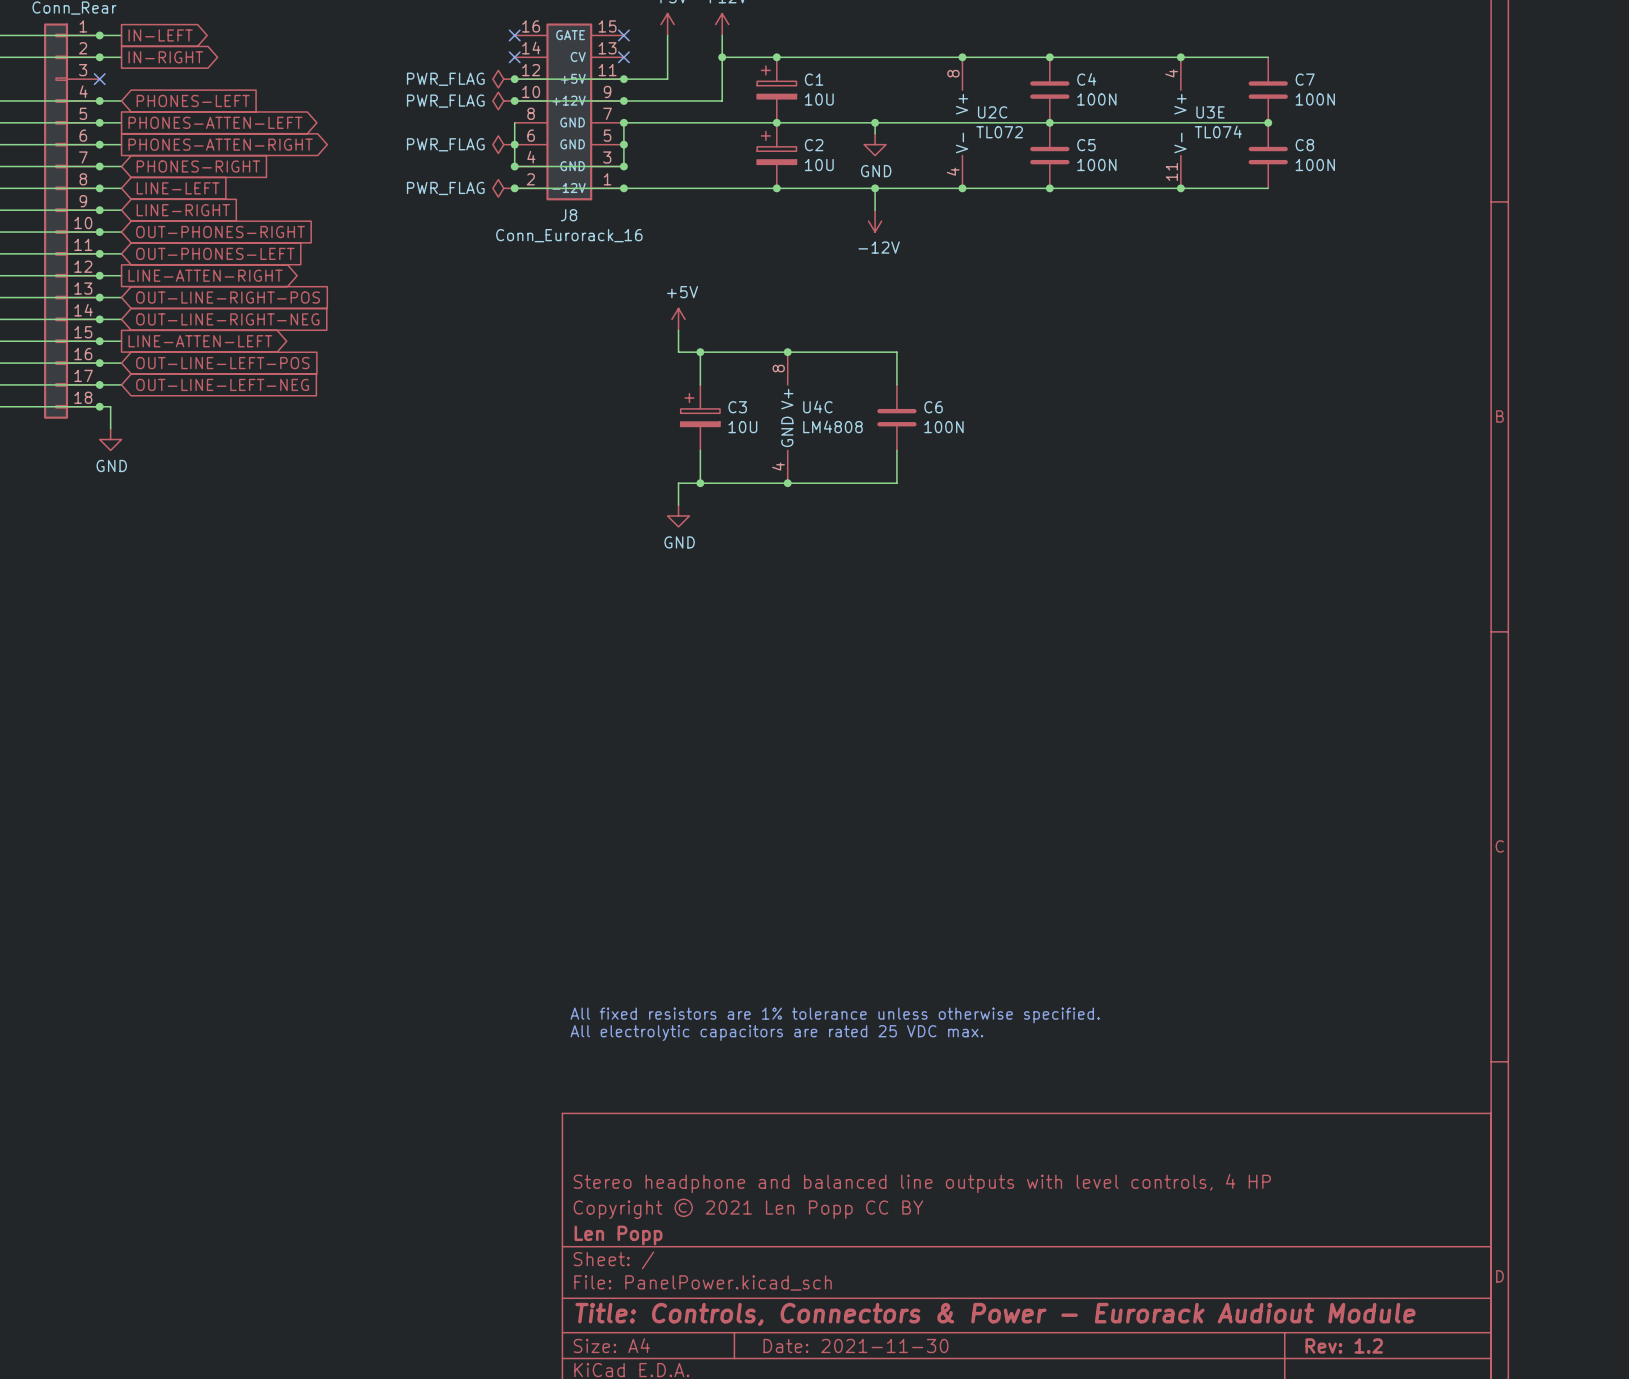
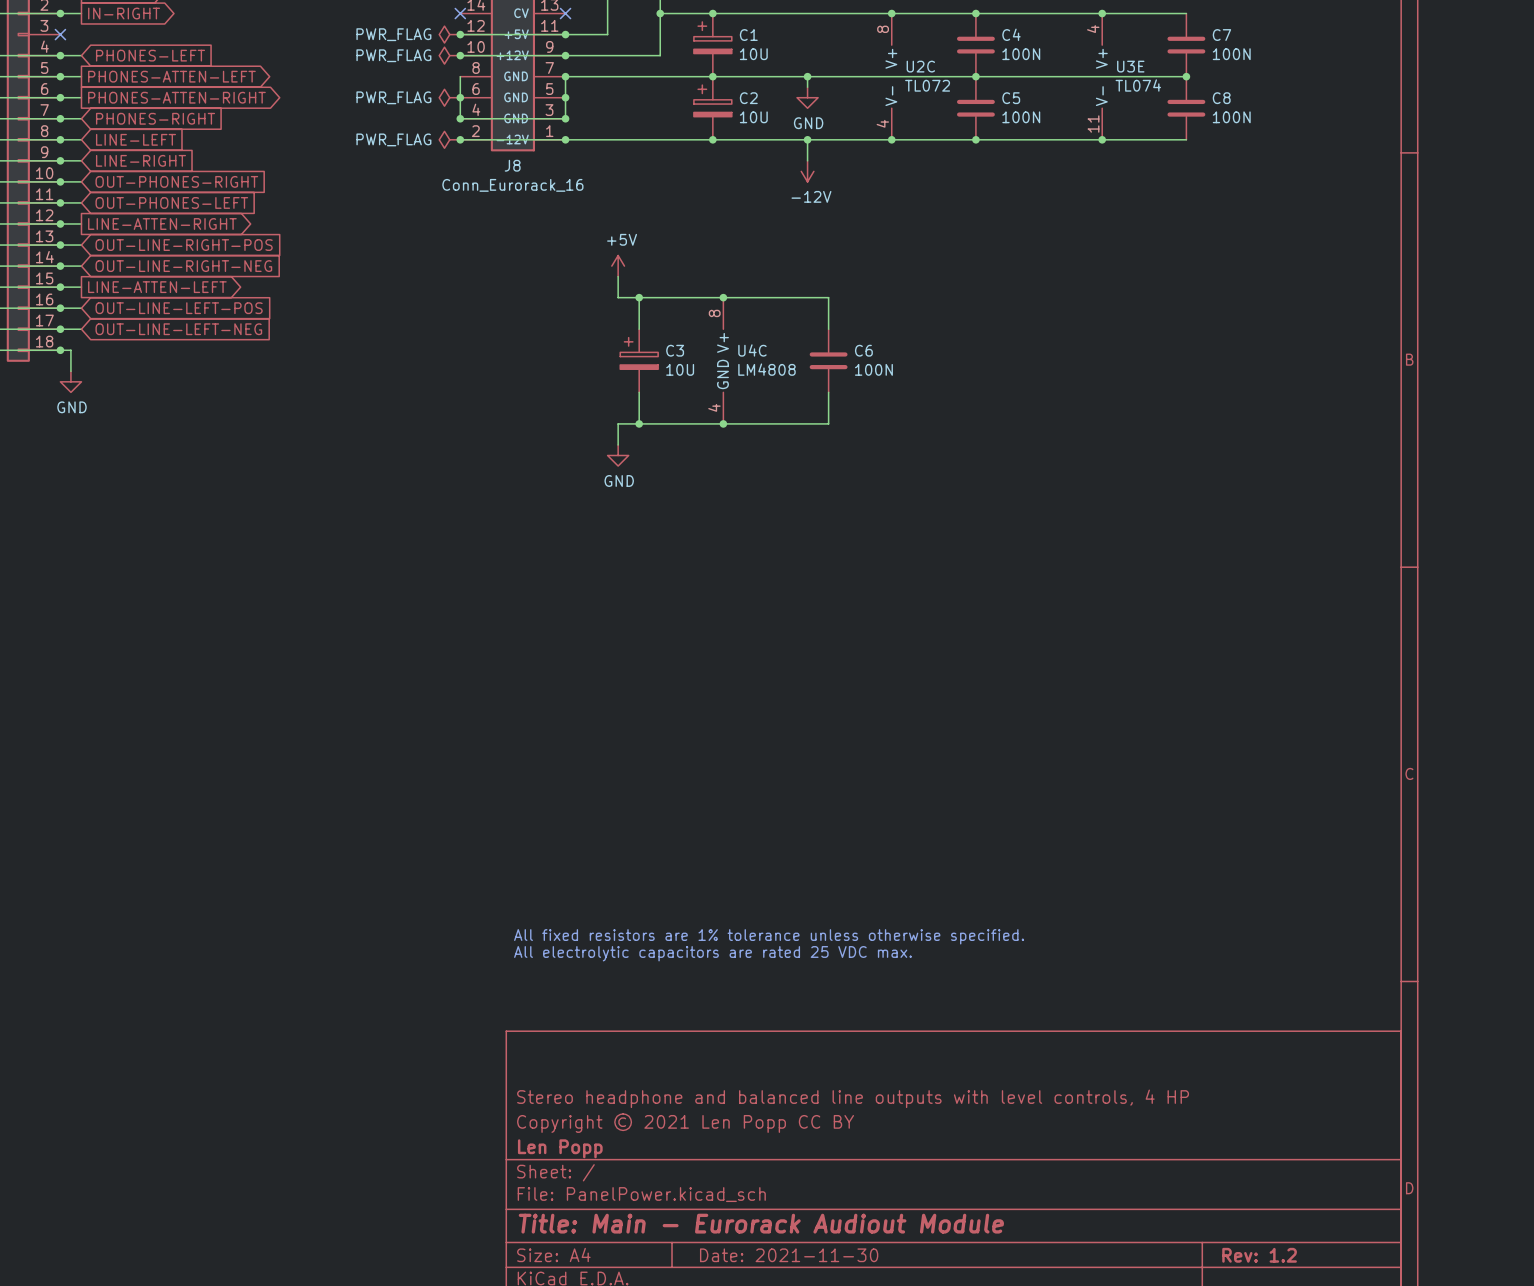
title block: Title: Controls, Connectors & Power - Eurorack Audiout Module (995, 1314) -> Title: Main - Eurorack Audiout Module (761, 1223)

